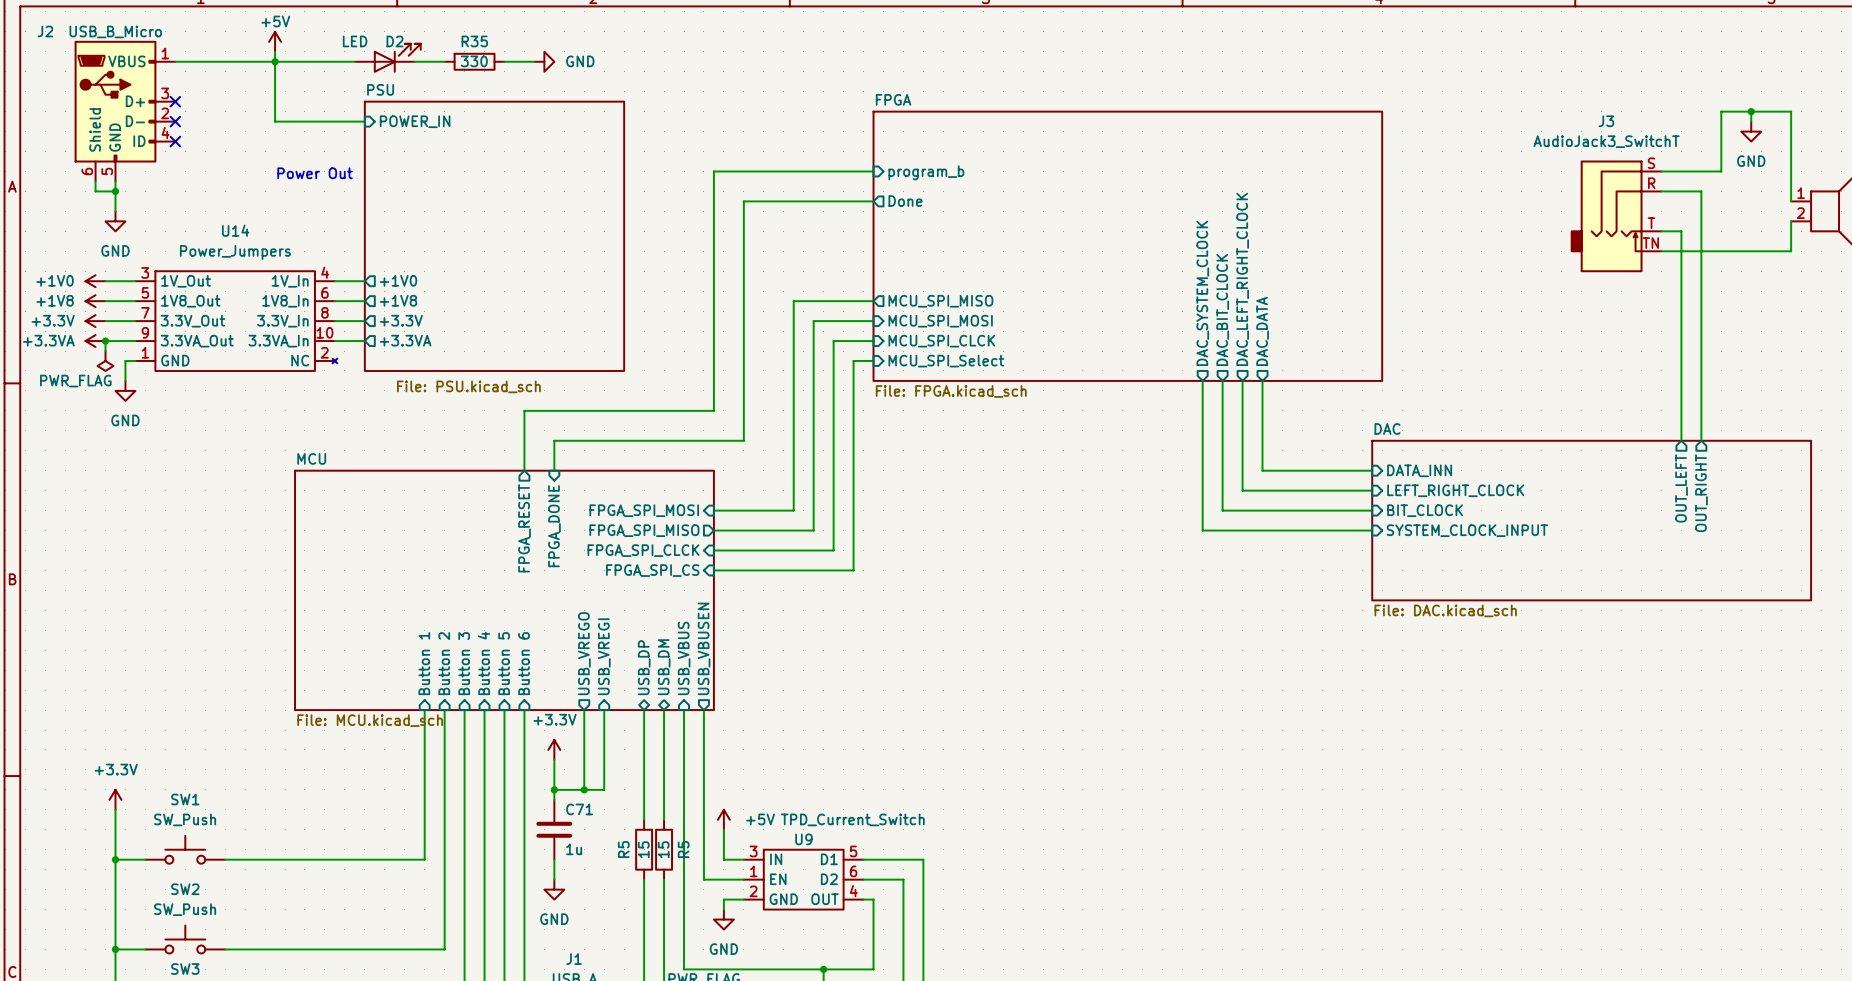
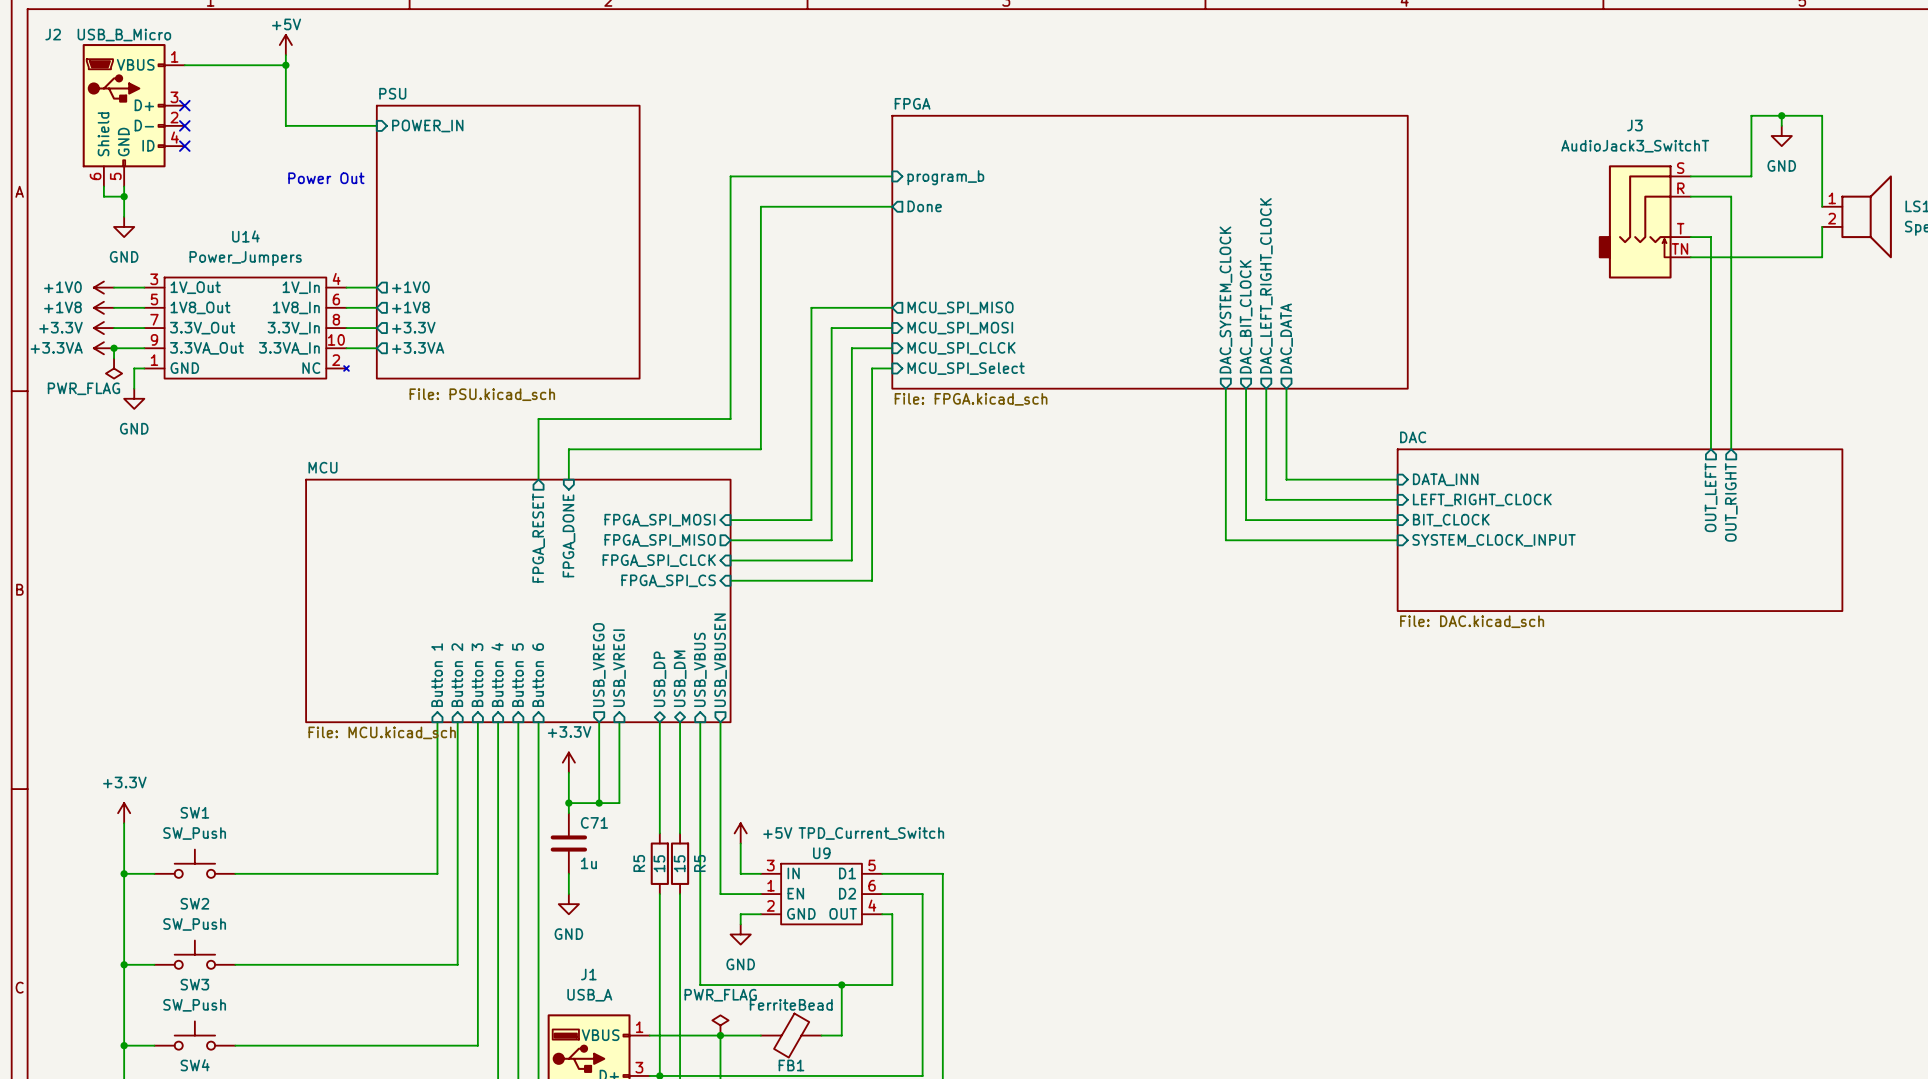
D2: LED (387, 58) -> none
wire: (275, 61) (354, 61) -> none
wire: (414, 61) (444, 61) -> none
R35: 330 (474, 61) -> none
wire: (504, 61) (534, 61) -> none
power symbol: GND (544, 61) -> none

